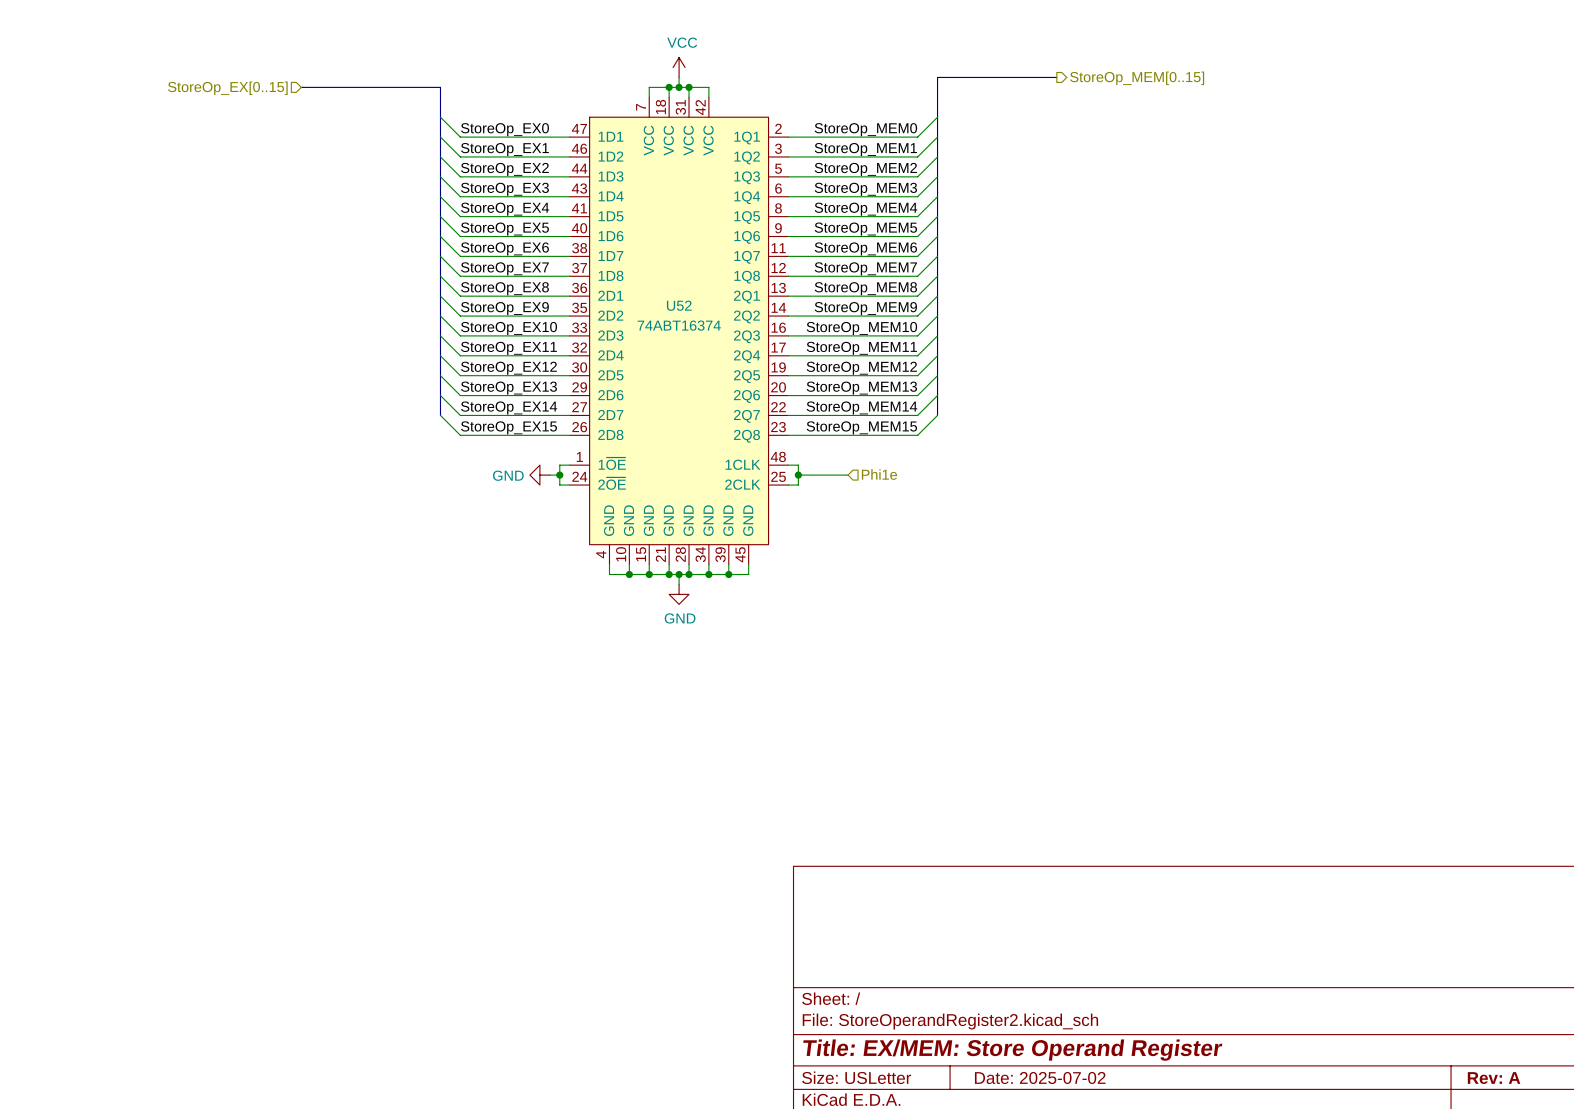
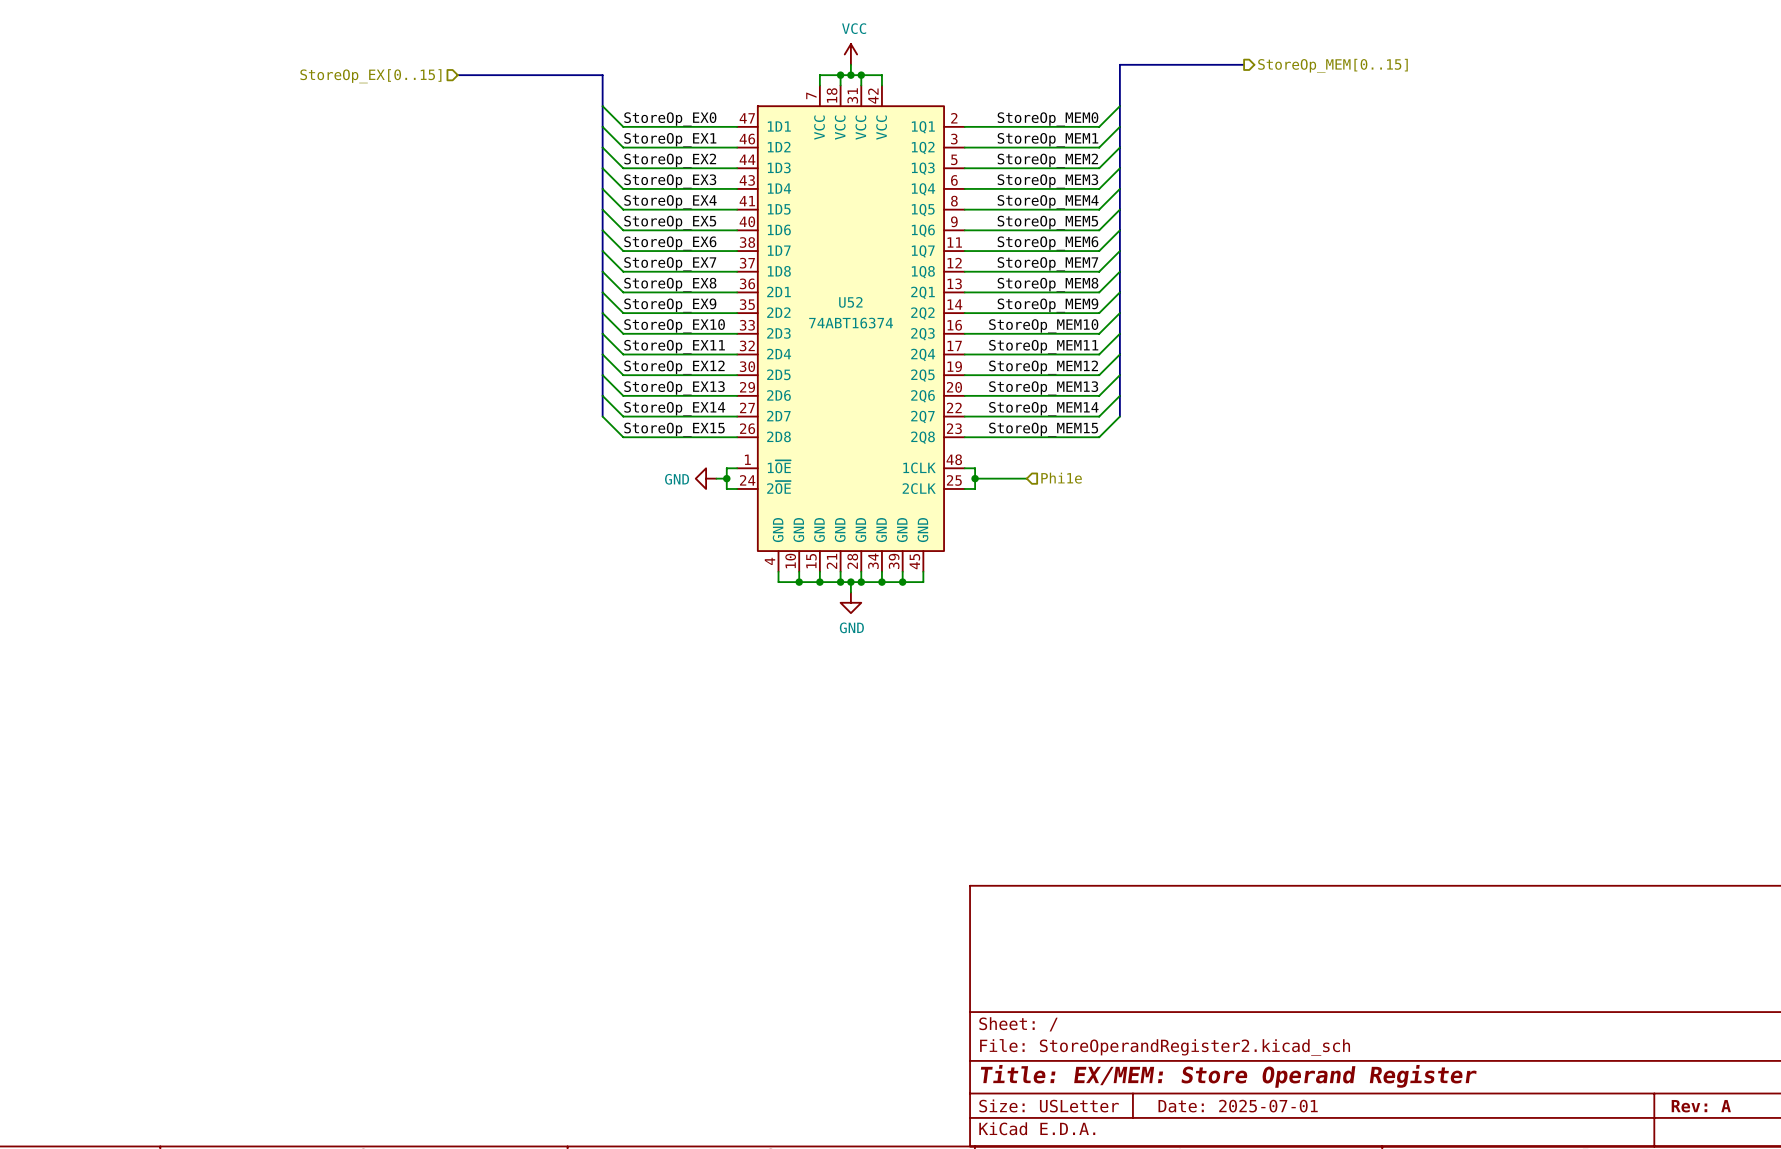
title block: Date: 2025-07-02 (1040, 1077) -> Date: 2025-07-01 (1238, 1106)

